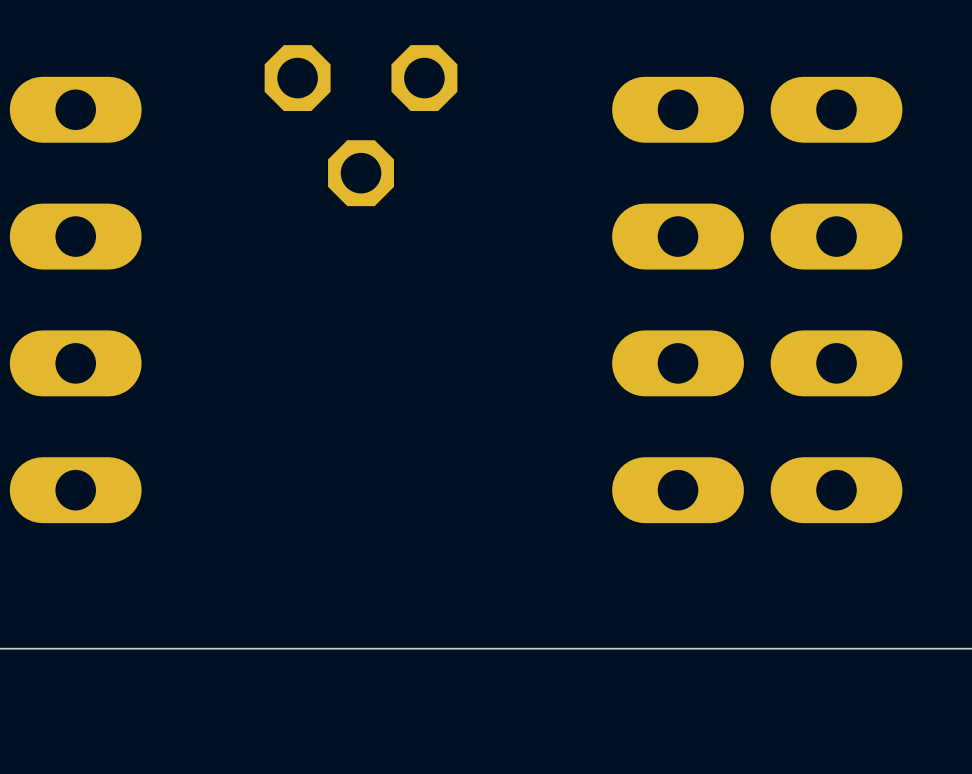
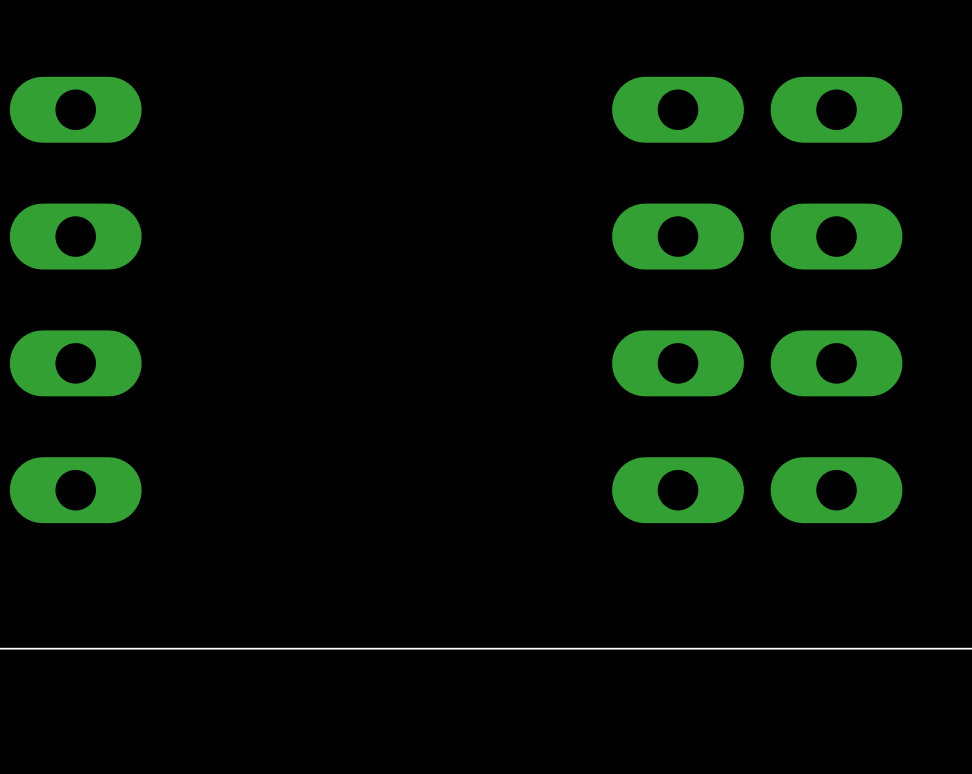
part: (361, 125) -> none

